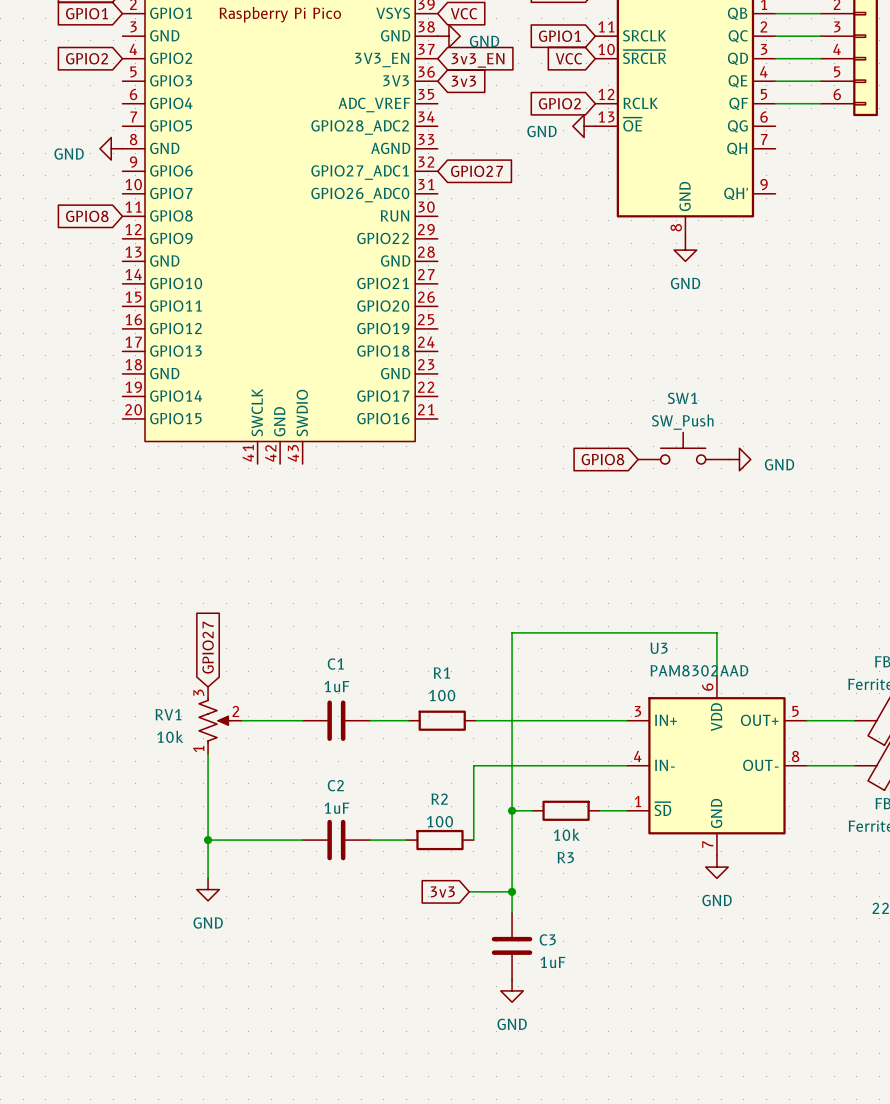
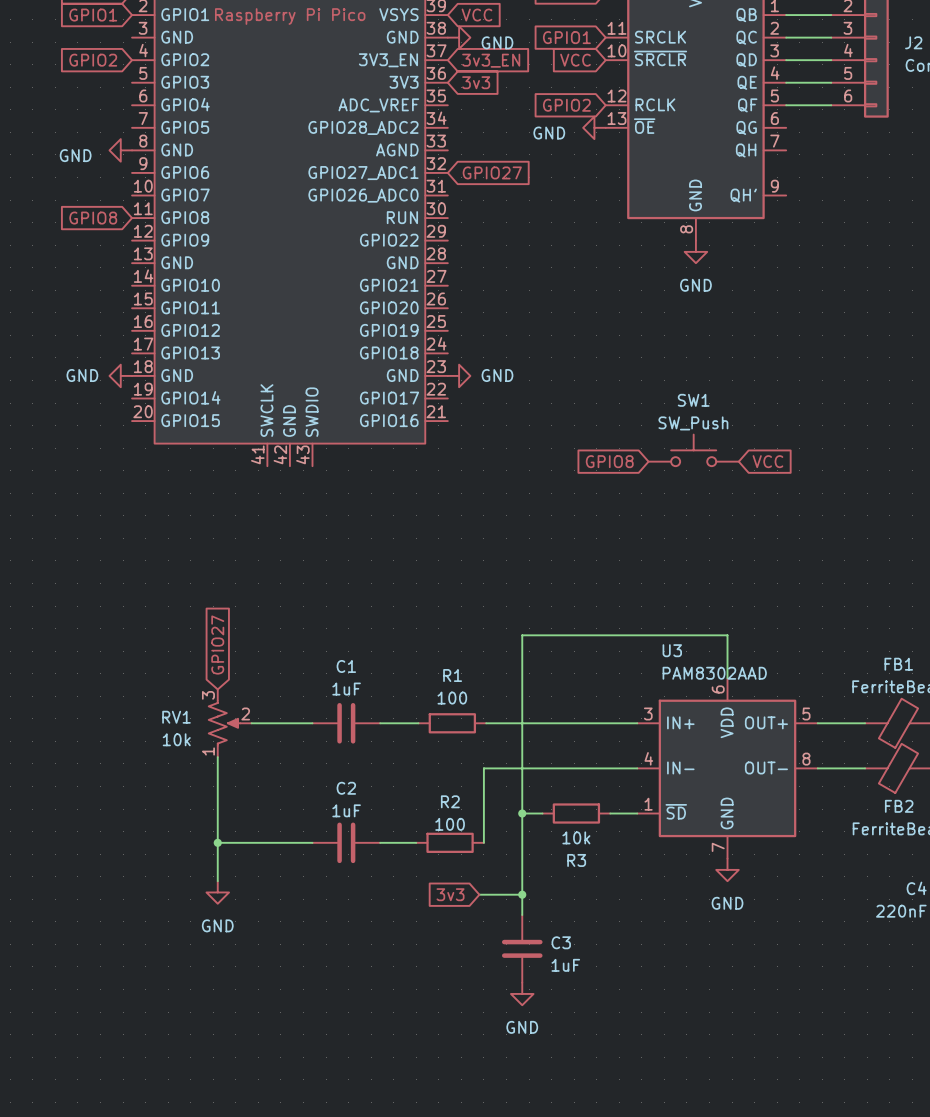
power symbol: none -> GND (120, 375)
power symbol: none -> GND (459, 375)
power symbol: GND (739, 459) -> none
global label: none -> VCC (767, 461)

